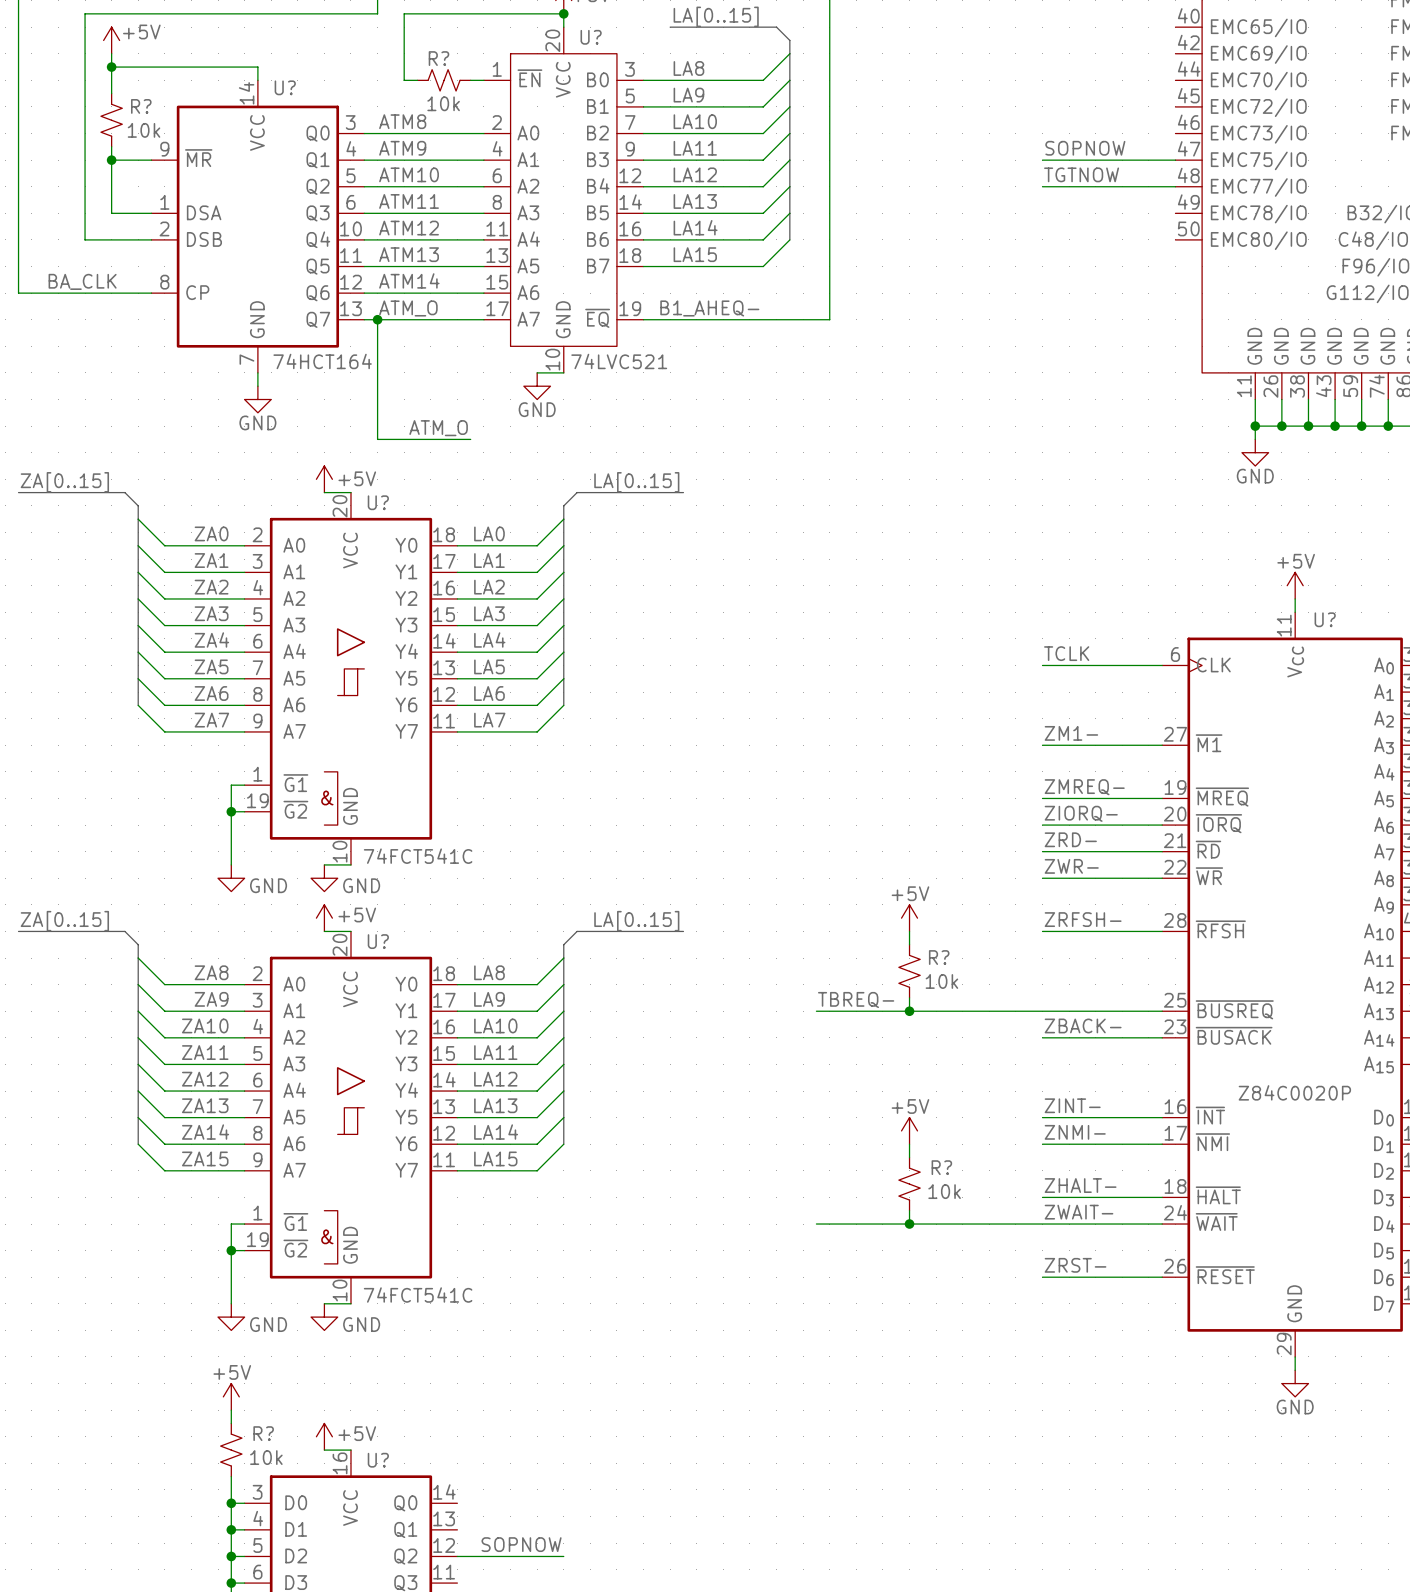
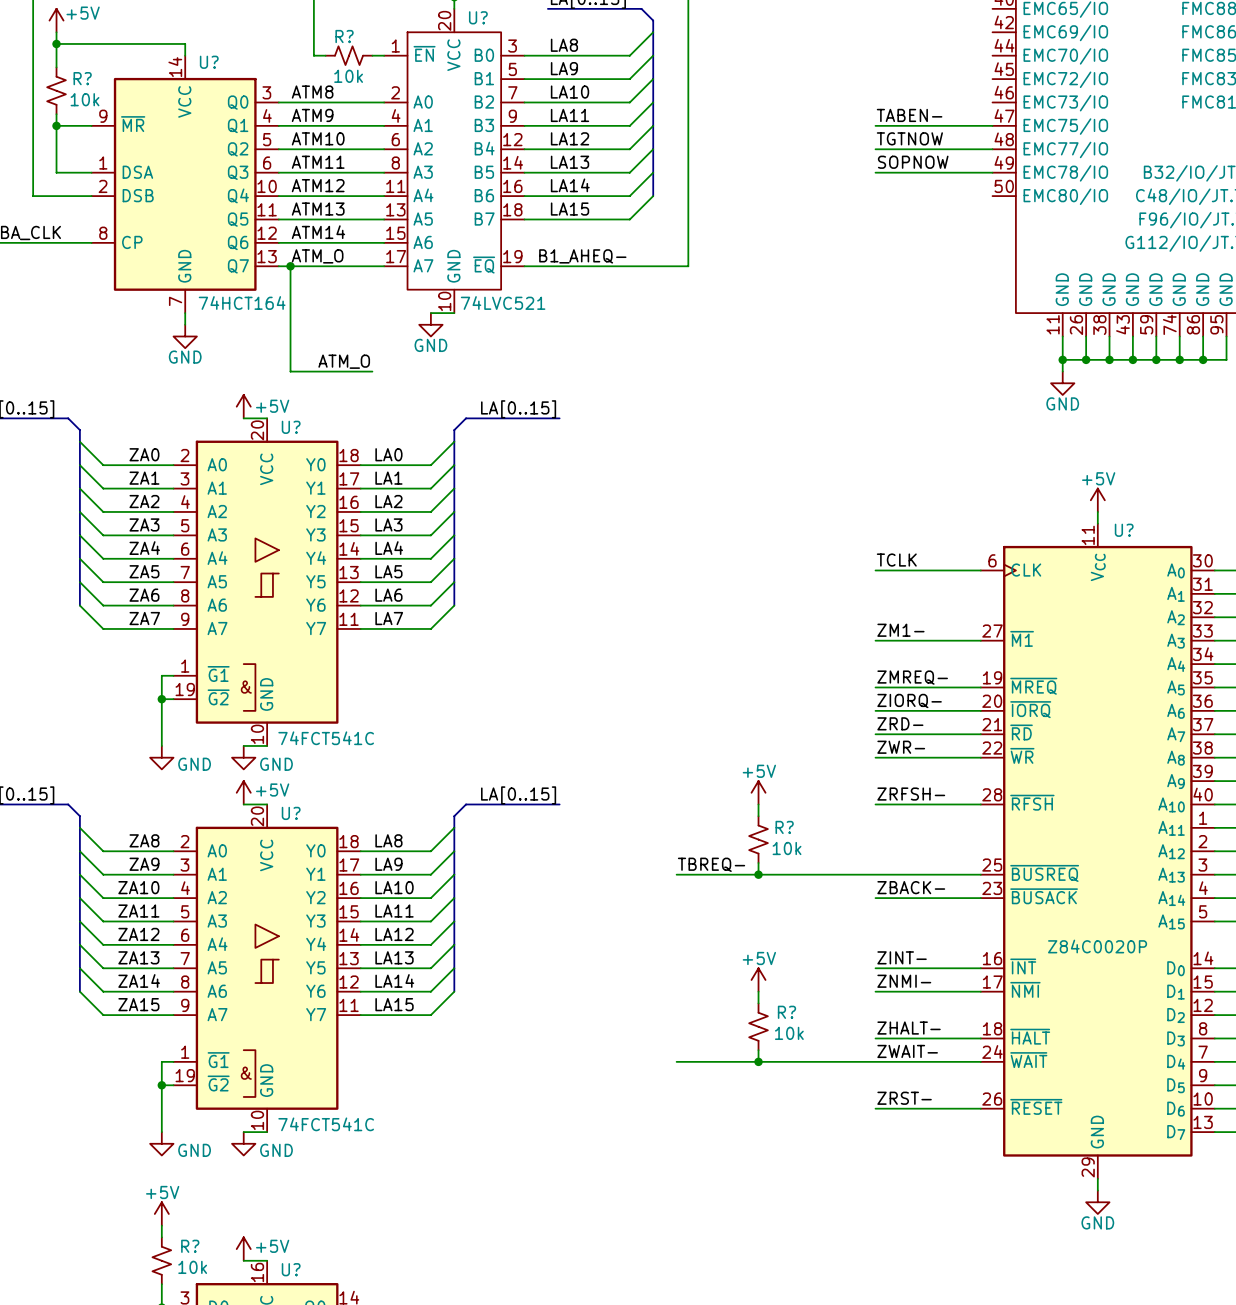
label: SOPNOW (1085, 148) -> TABEN- (909, 115)
label: none -> SOPNOW (913, 162)
wire: none -> (875, 172) (992, 172)

